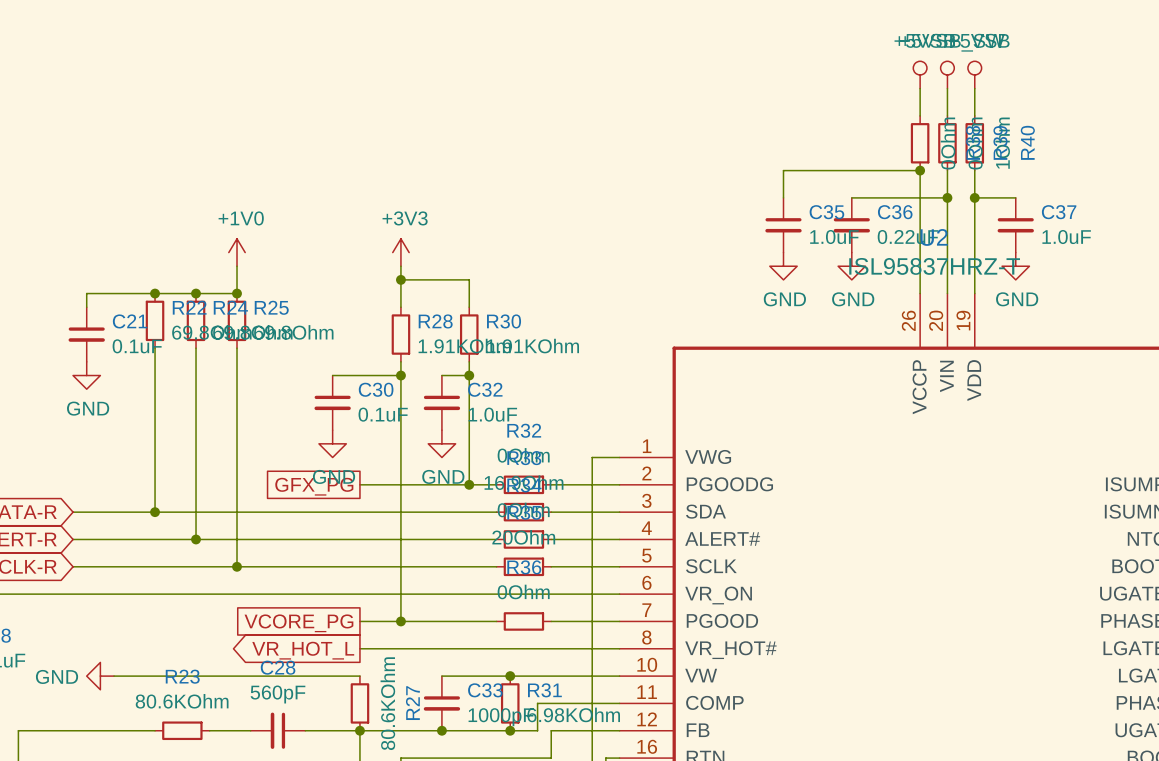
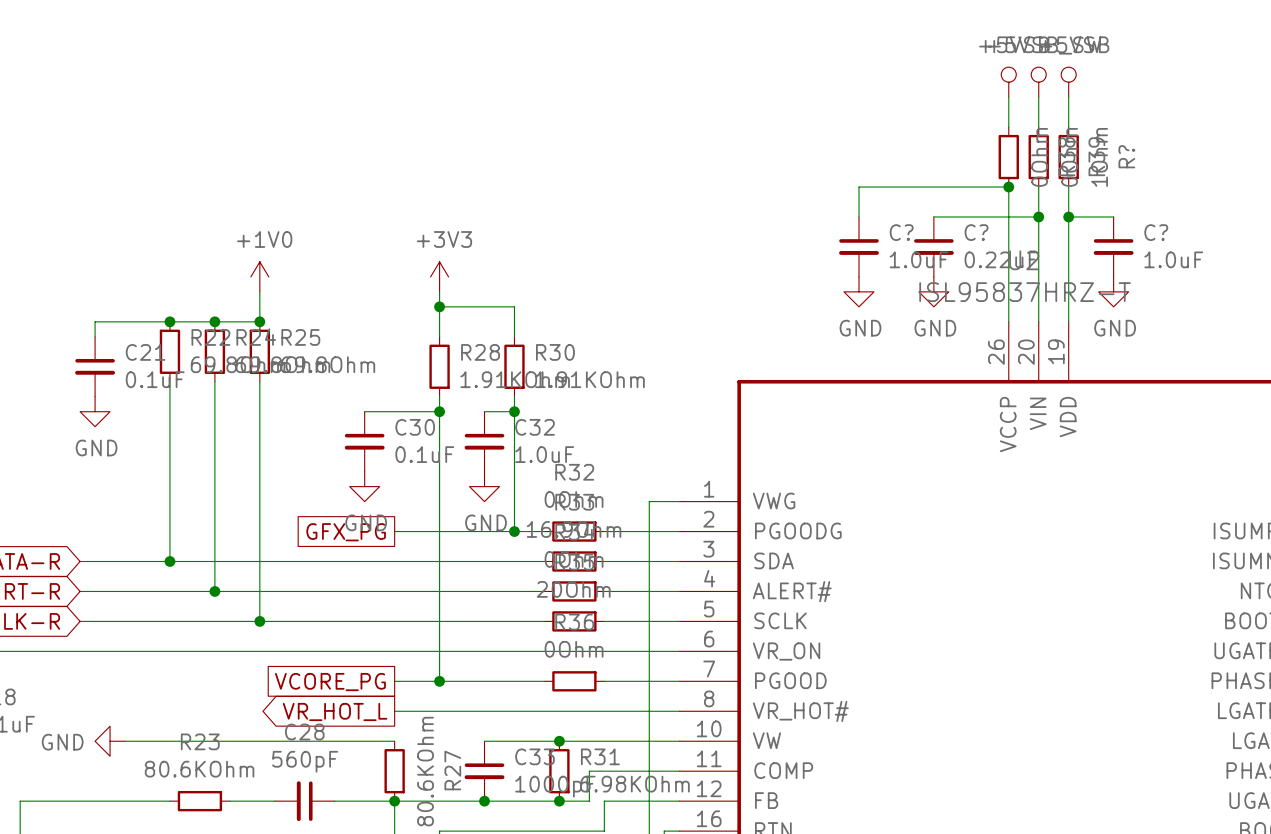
R40 name: R40 (1027, 142) -> R? (1126, 156)
C35 name: C35 (826, 212) -> C? (901, 232)
C36 name: C36 (895, 212) -> C? (976, 232)
C37 name: C37 (1059, 212) -> C? (1156, 232)

